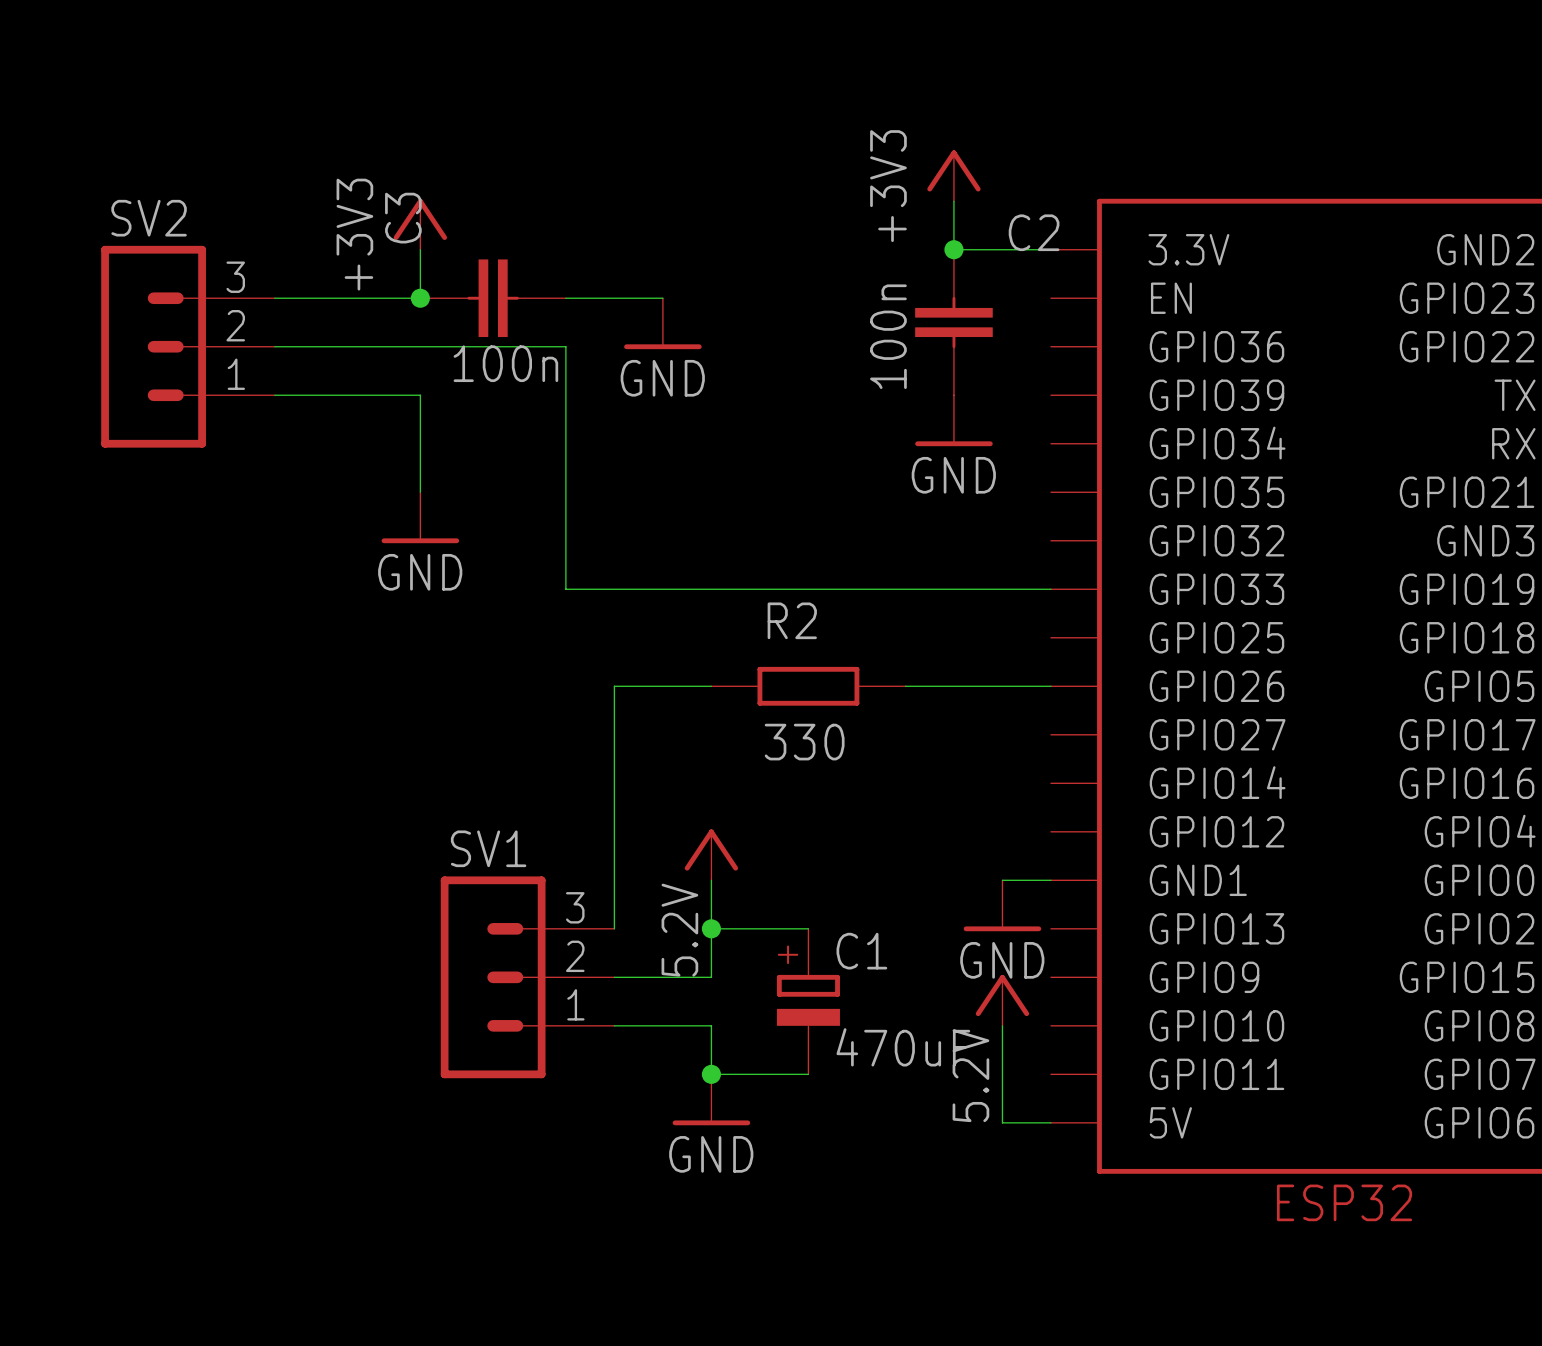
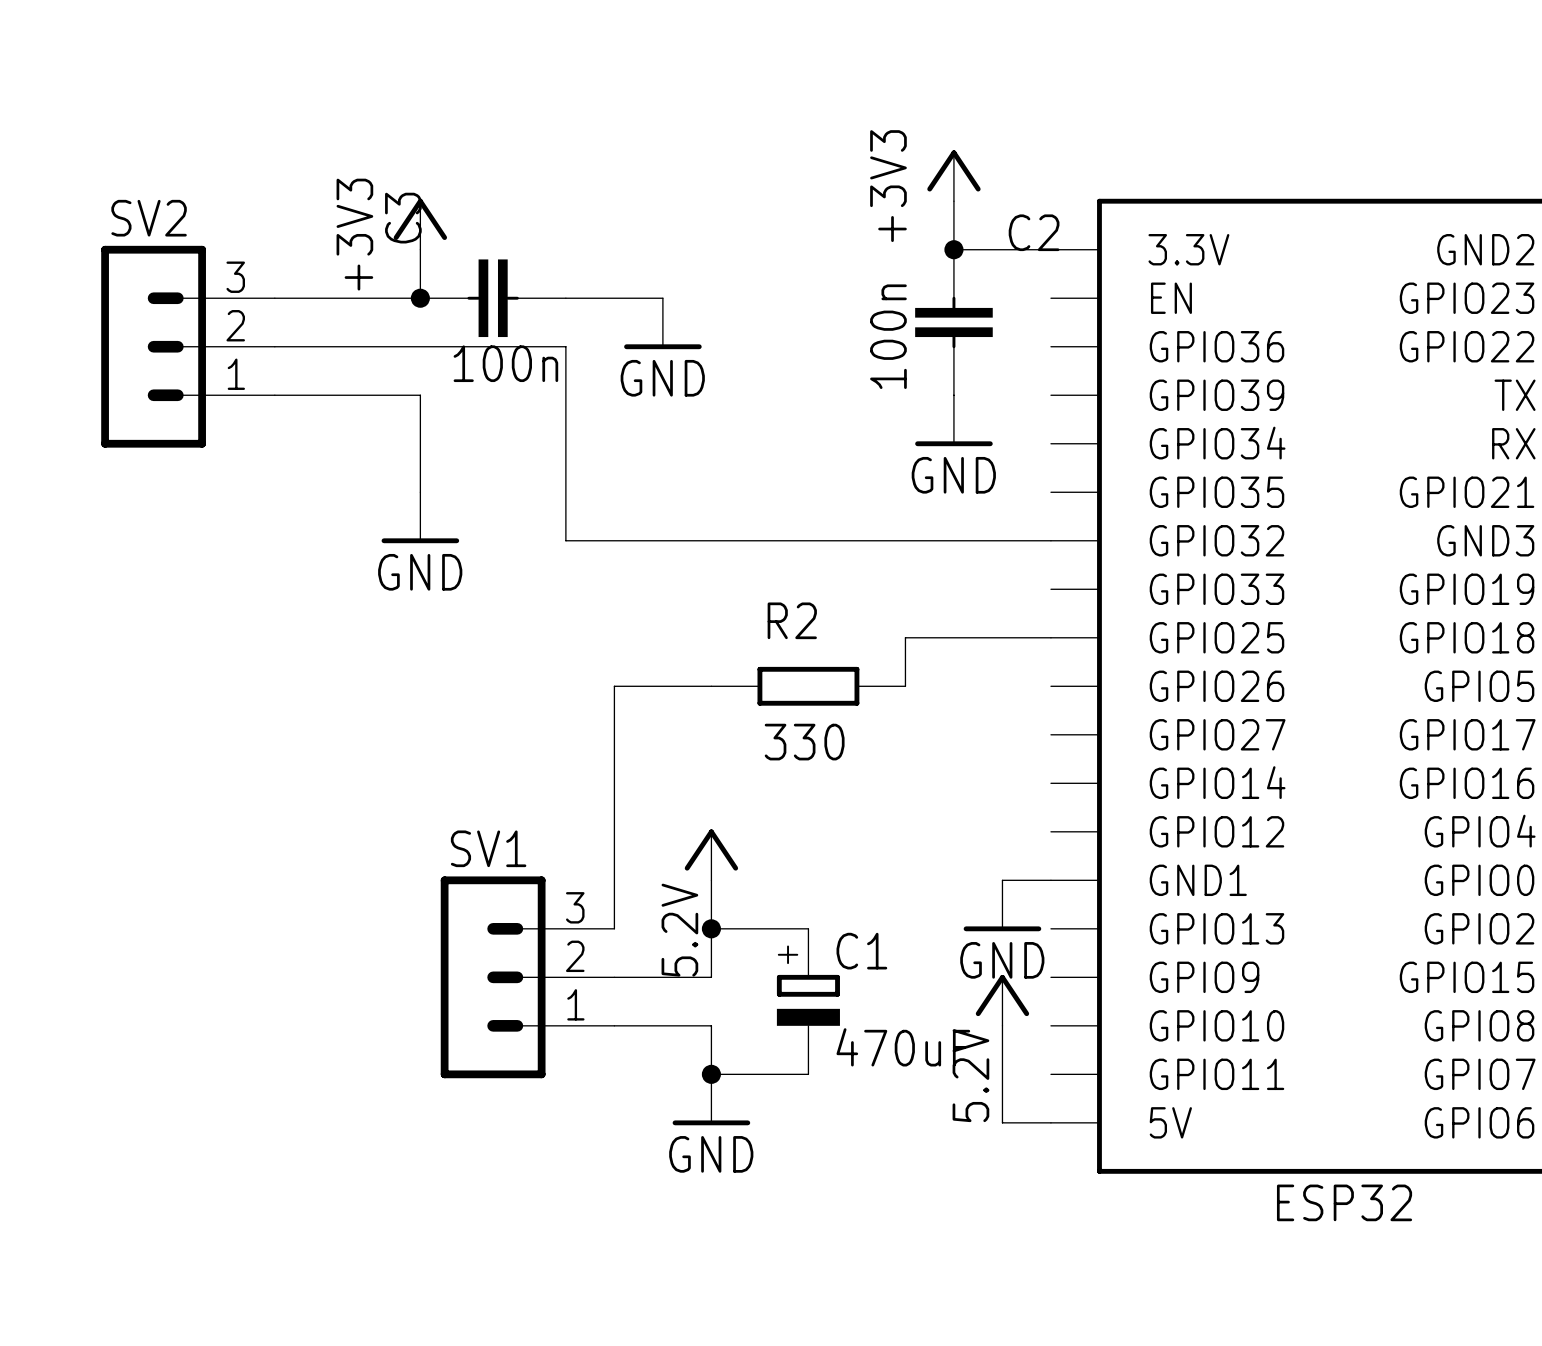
wire: (565, 540) (565, 589) (1050, 589) -> (565, 540) (1050, 540)
wire: (905, 686) (1050, 686) -> (905, 686) (905, 637) (1050, 637)

